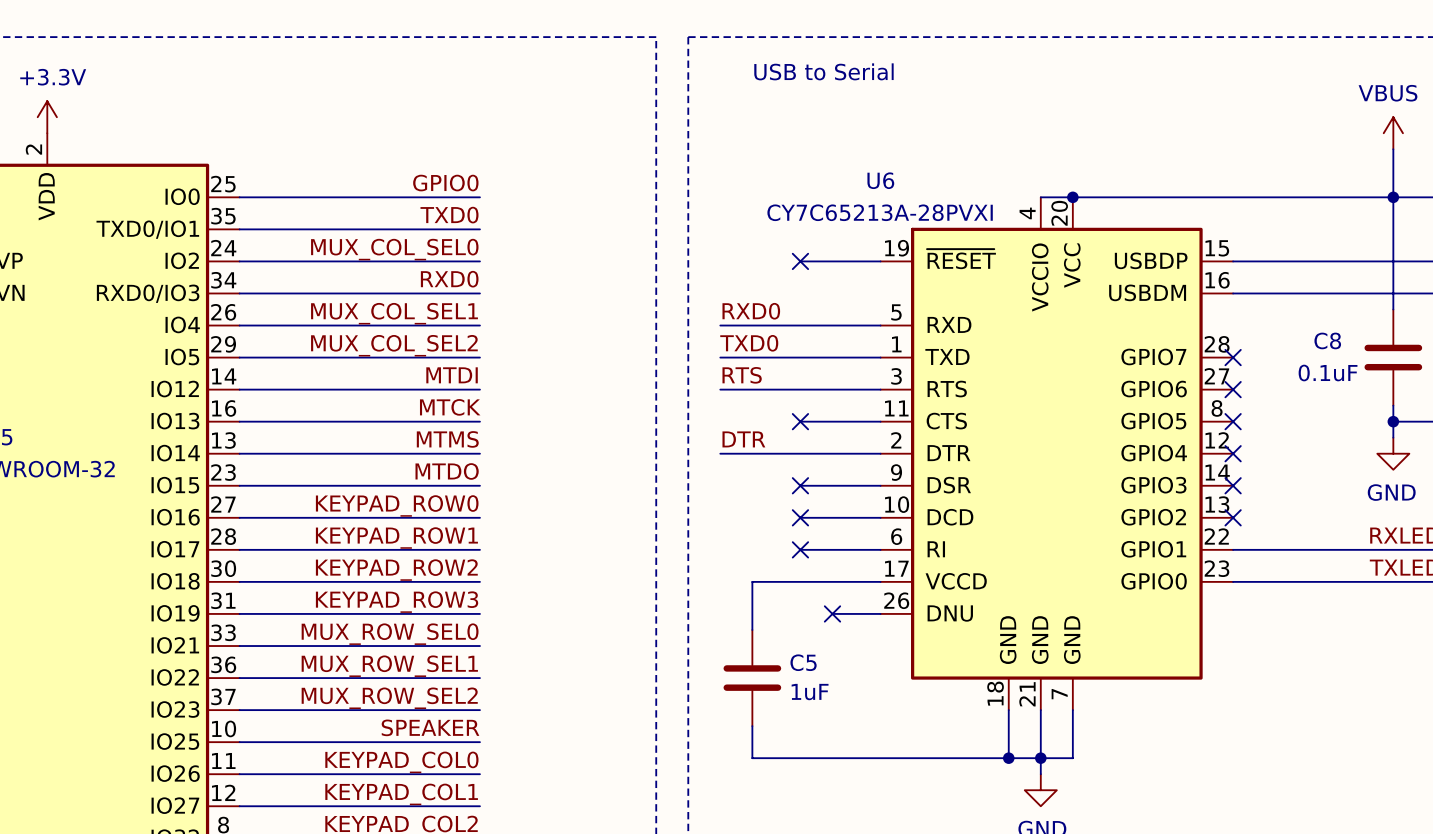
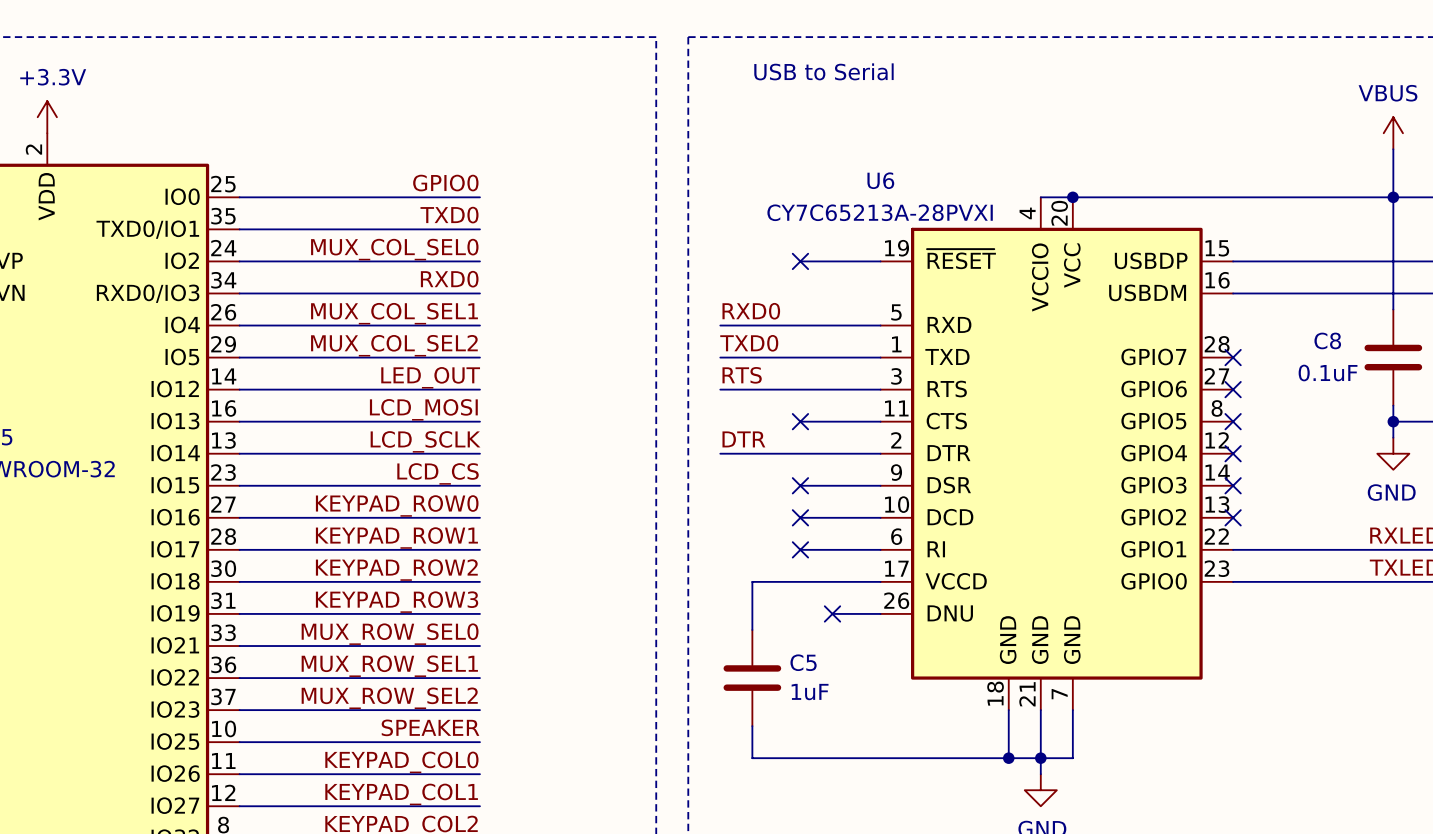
label: MTDI (452, 375) -> LED_OUT (430, 377)
label: MTCK (450, 407) -> LCD_MOSI (423, 409)
label: MTMS (447, 439) -> LCD_SCLK (425, 441)
label: MTDO (447, 471) -> LCD_CS (438, 473)

